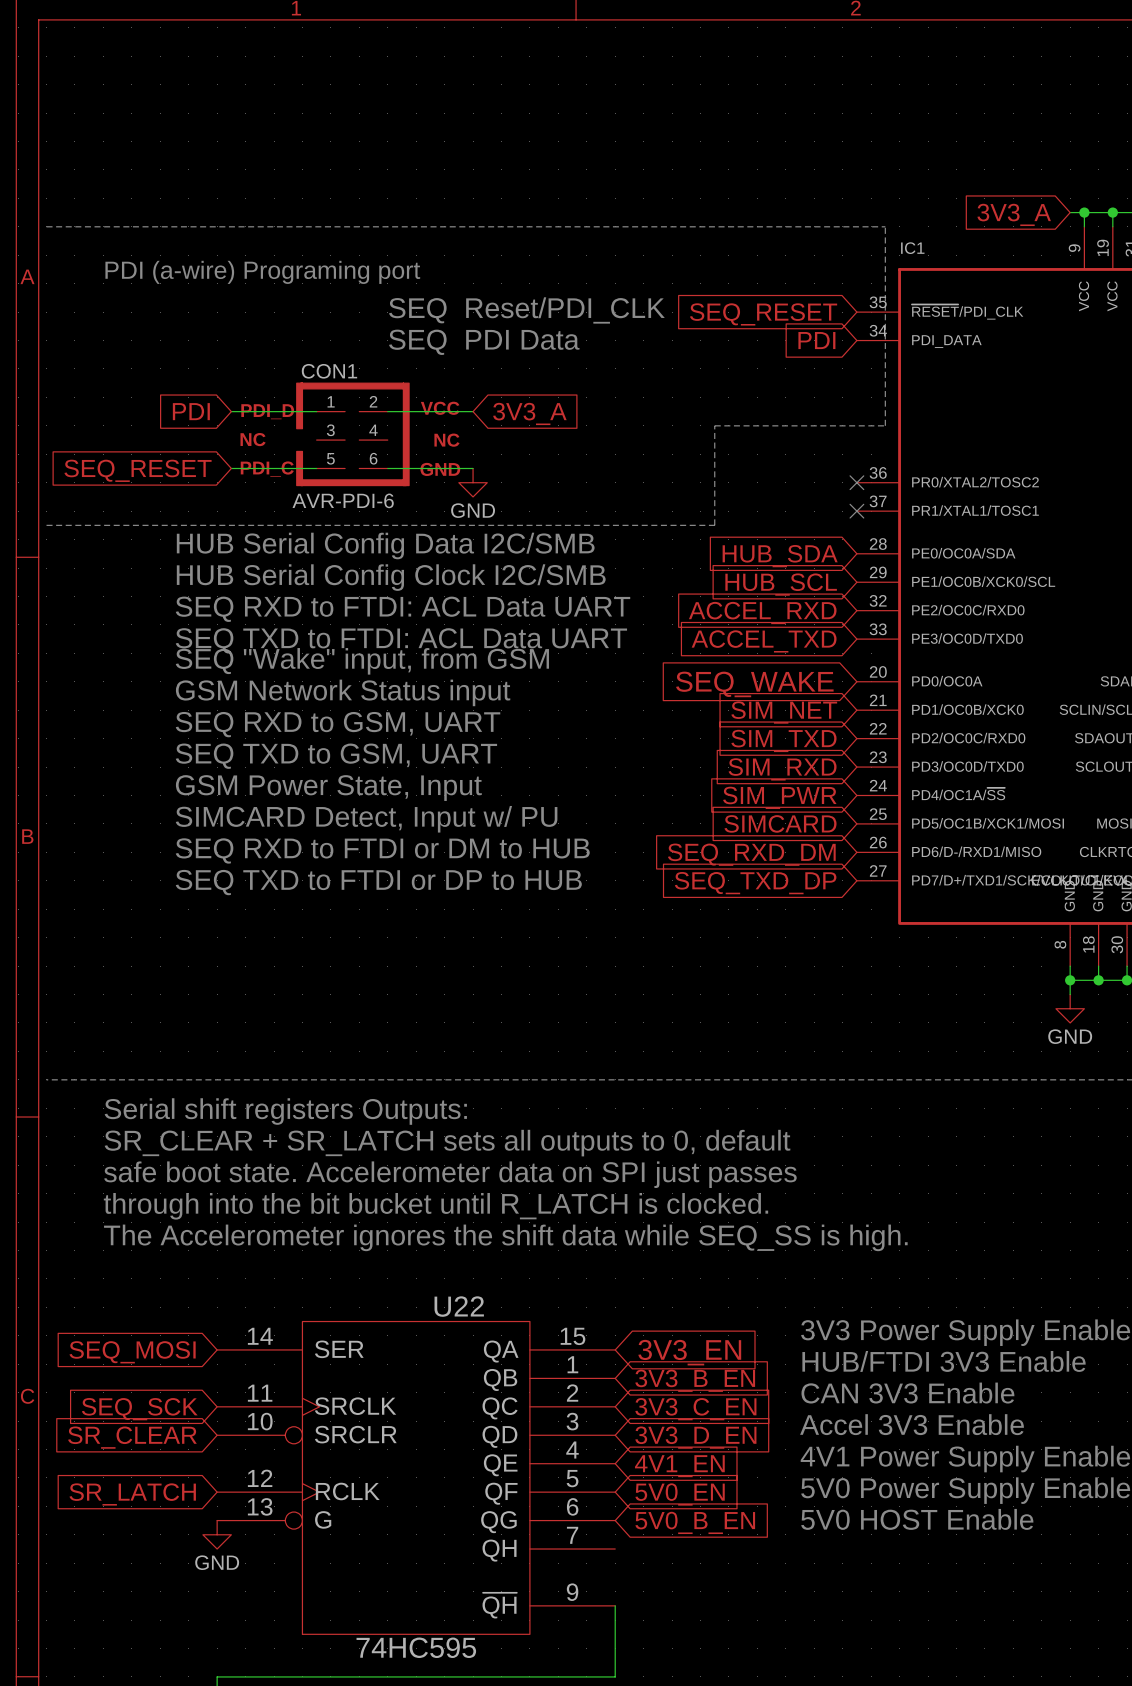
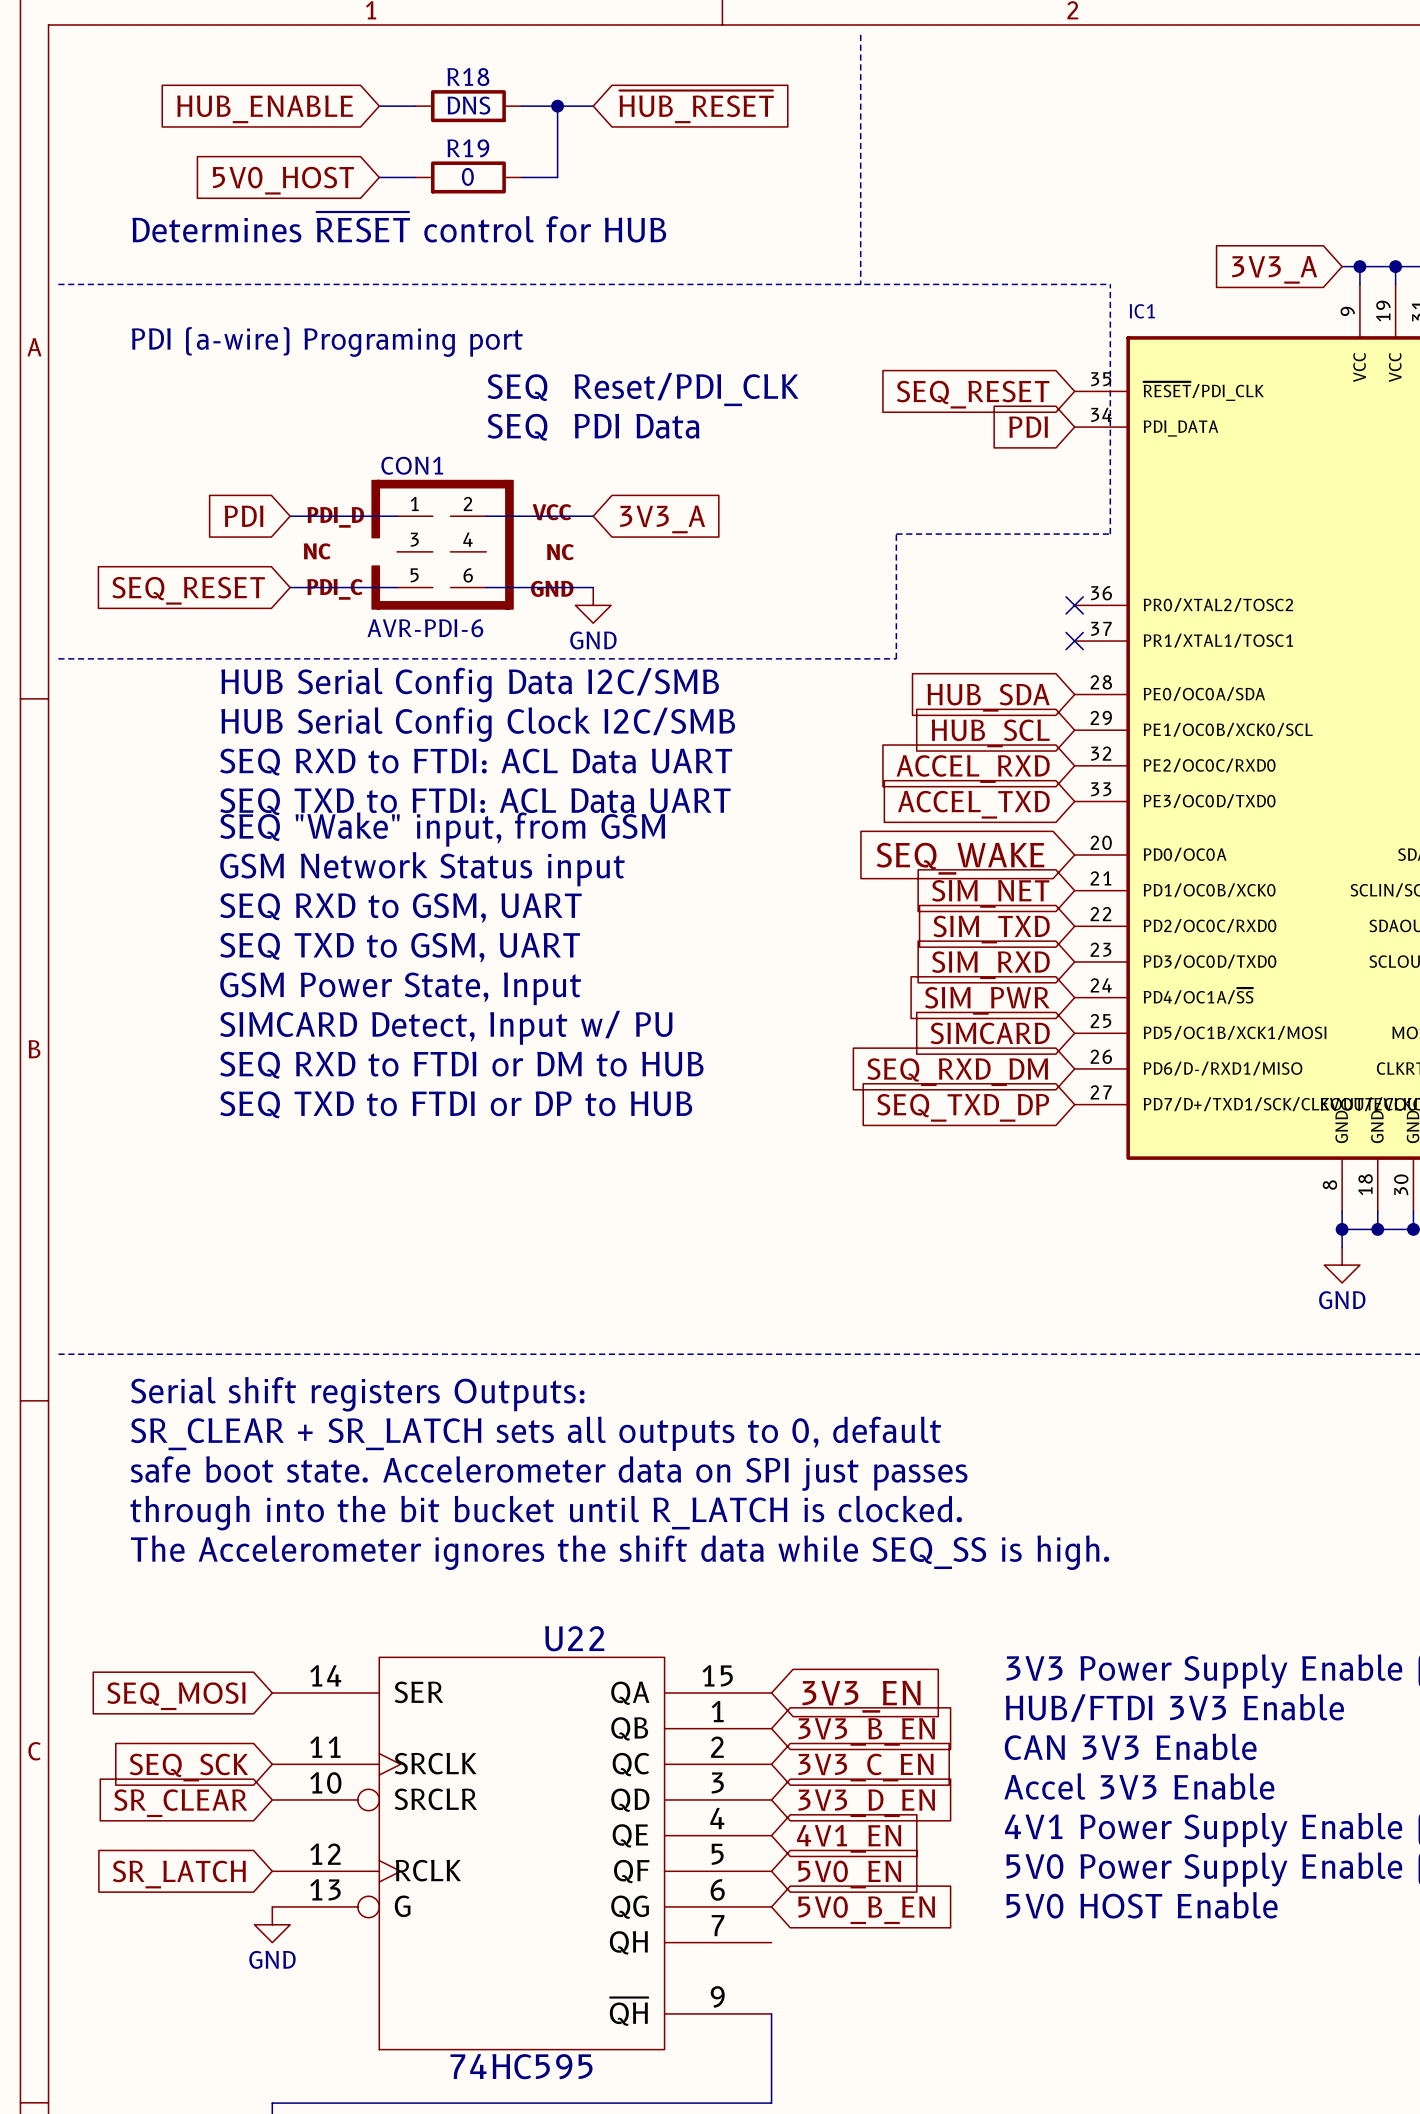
line: none -> (860, 34) (860, 284)
wire: none -> (379, 106) (414, 106)
R18: none -> DNS (468, 106)
wire: none -> (521, 106) (593, 106)
wire: none -> (557, 106) (557, 177) (521, 177)
junction: none -> (557, 106)
global label: none -> ~{HUB_RESET} (696, 106)
global label: none -> HUB_ENABLE (265, 109)
wire: none -> (379, 177) (414, 177)
R19: none -> 0 (468, 177)
global label: none -> 5V0_HOST (283, 180)
text: none -> Determines ~{RESET} control for HUB (399, 227)

